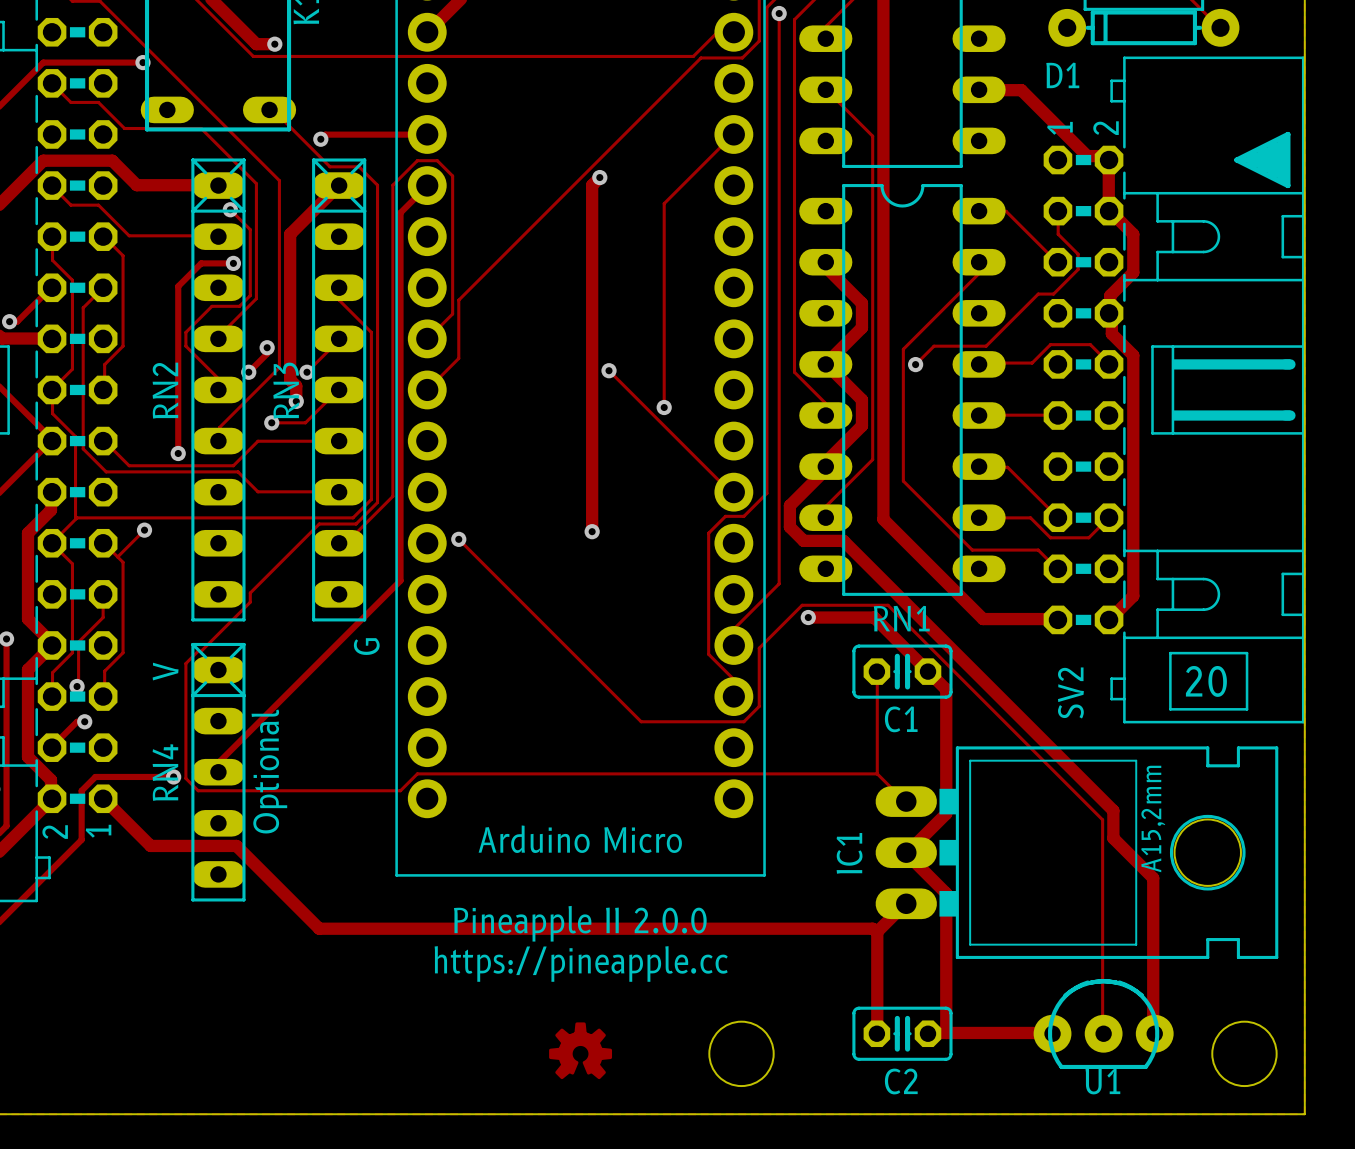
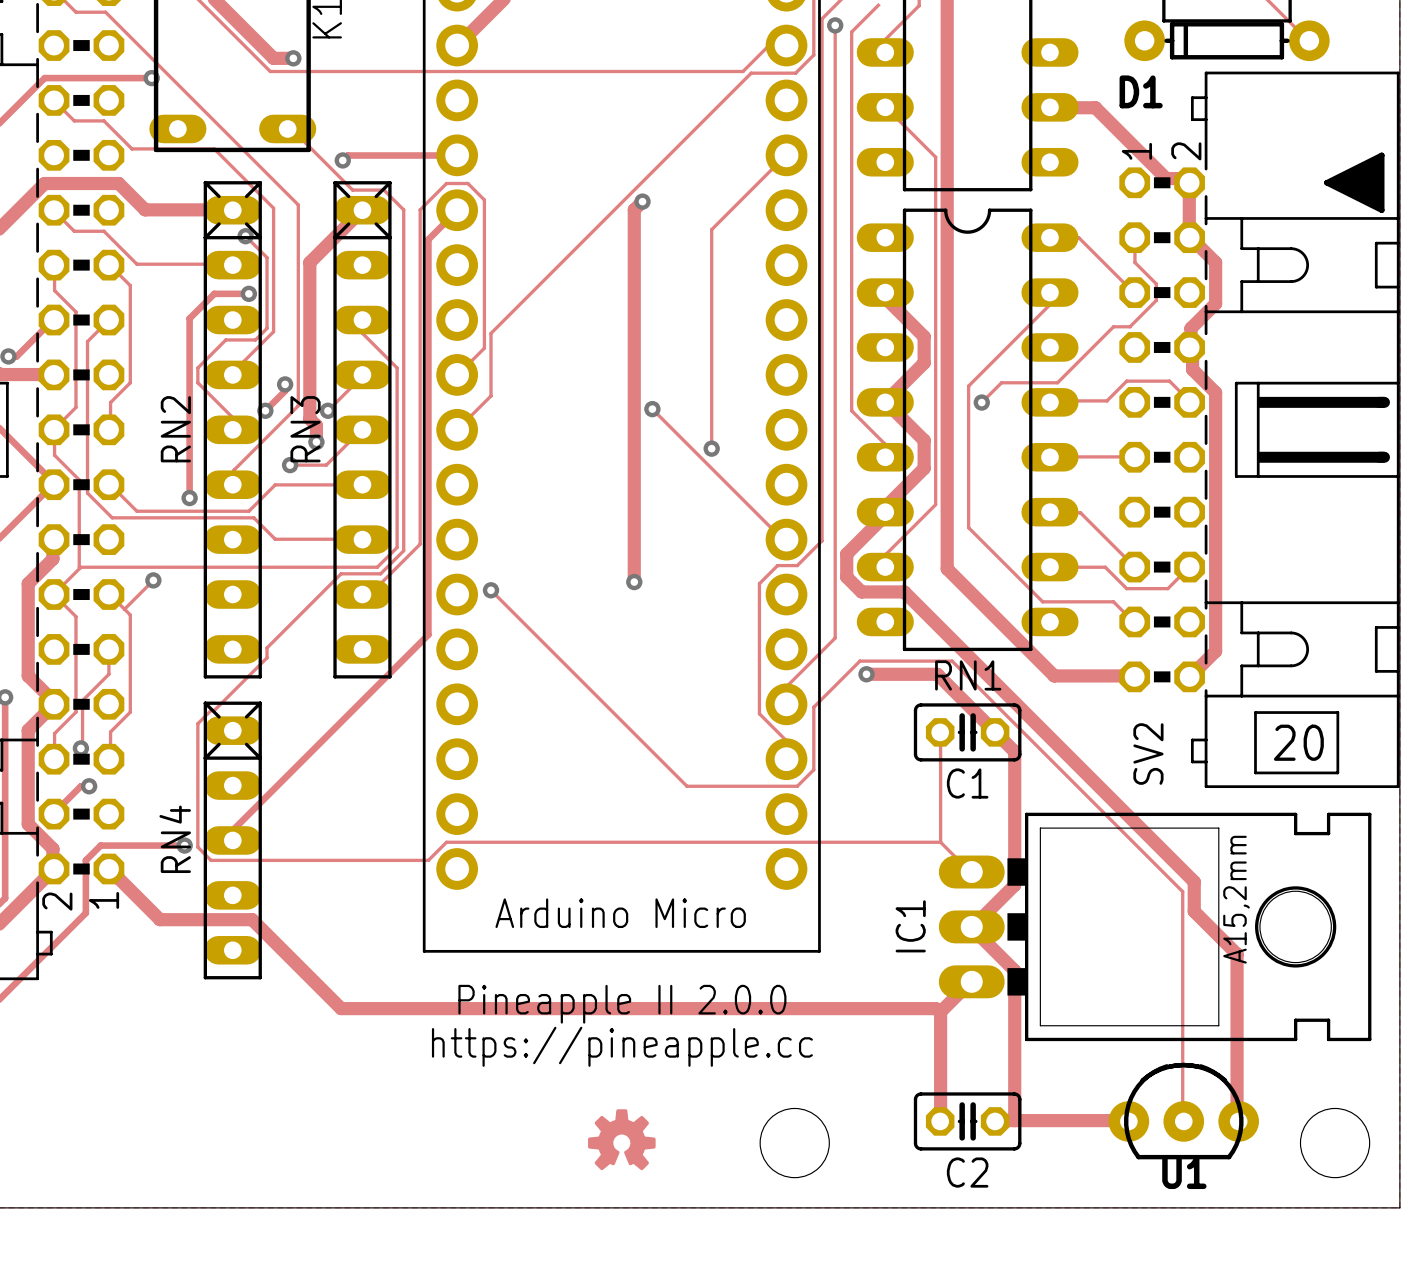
text: G (366, 646) -> none
text: V (165, 671) -> none
text: Optional (269, 771) -> none

